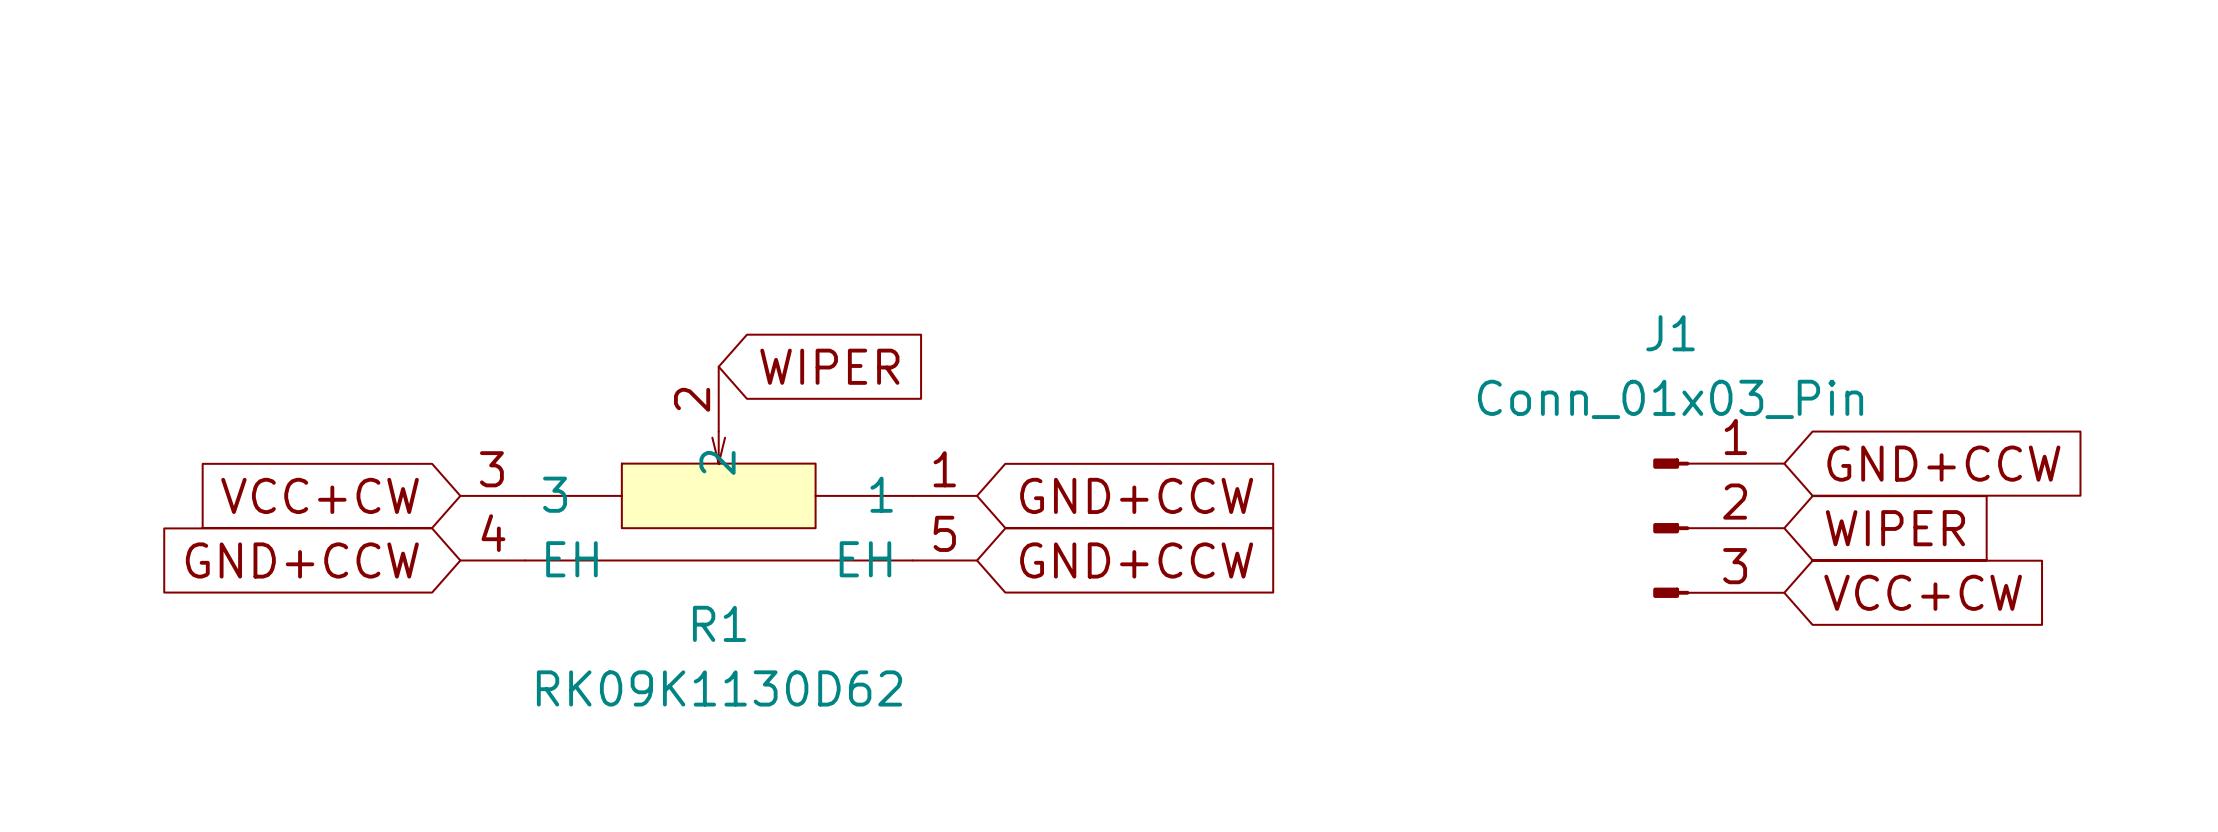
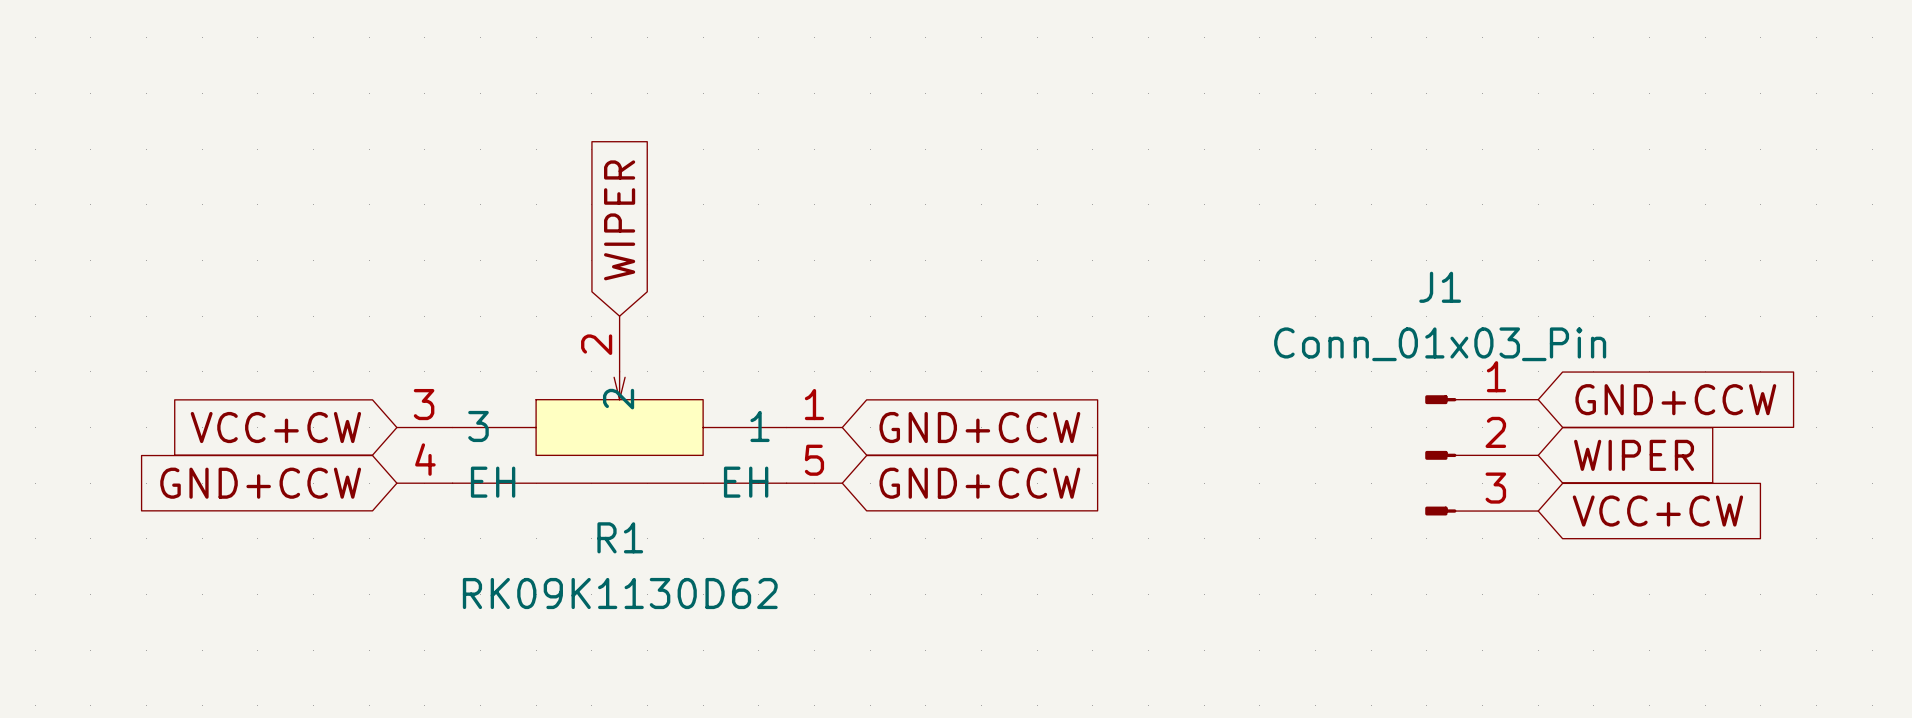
global label rotation: 0° (829, 366) -> 90° counterclockwise (619, 220)

